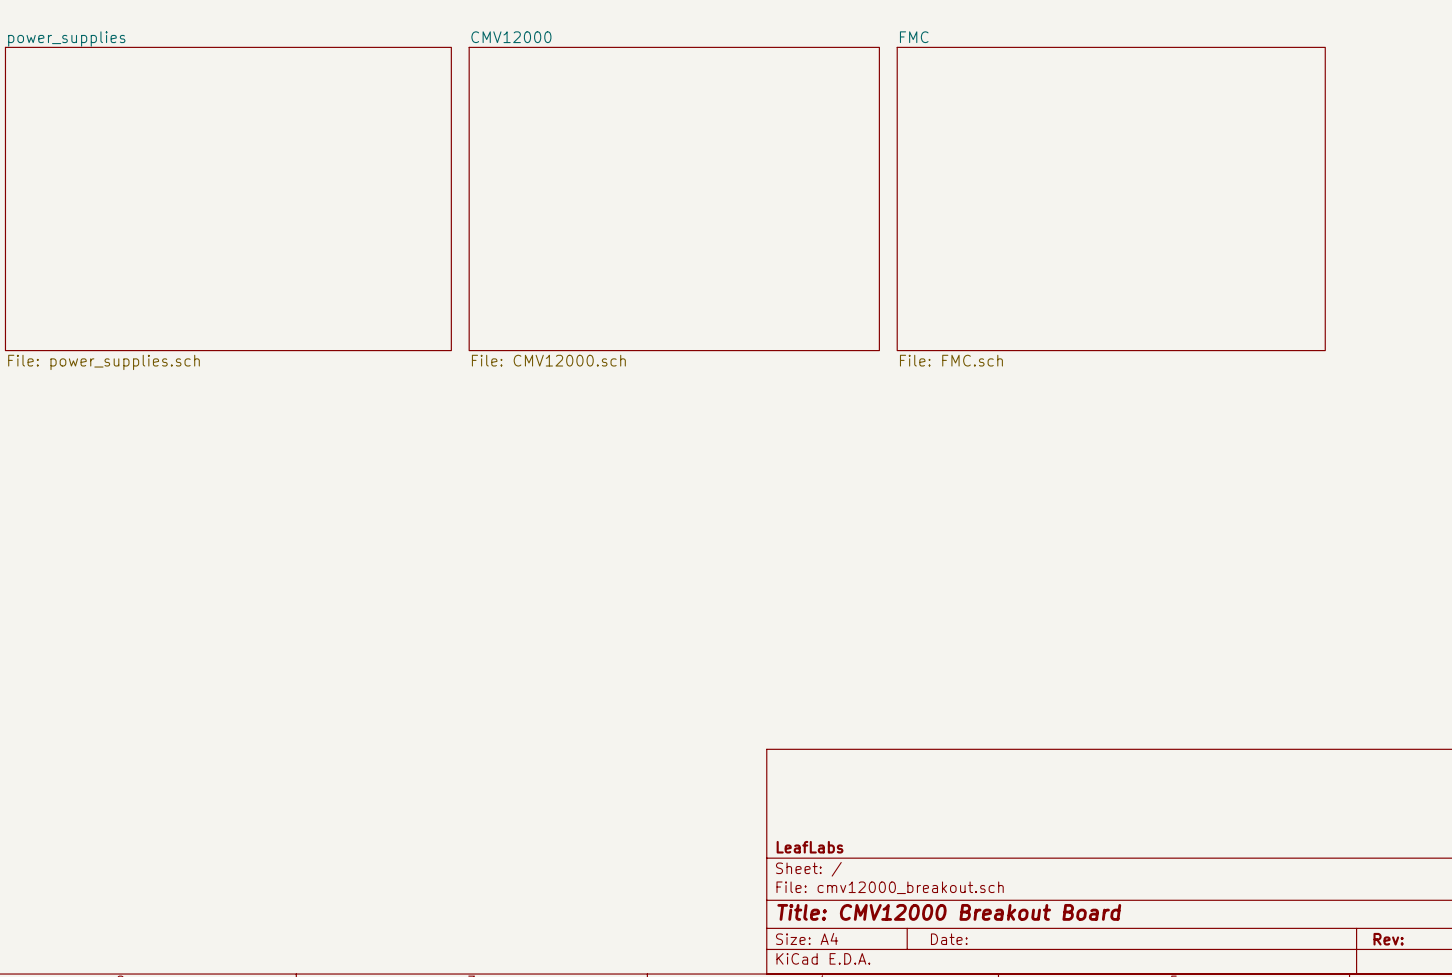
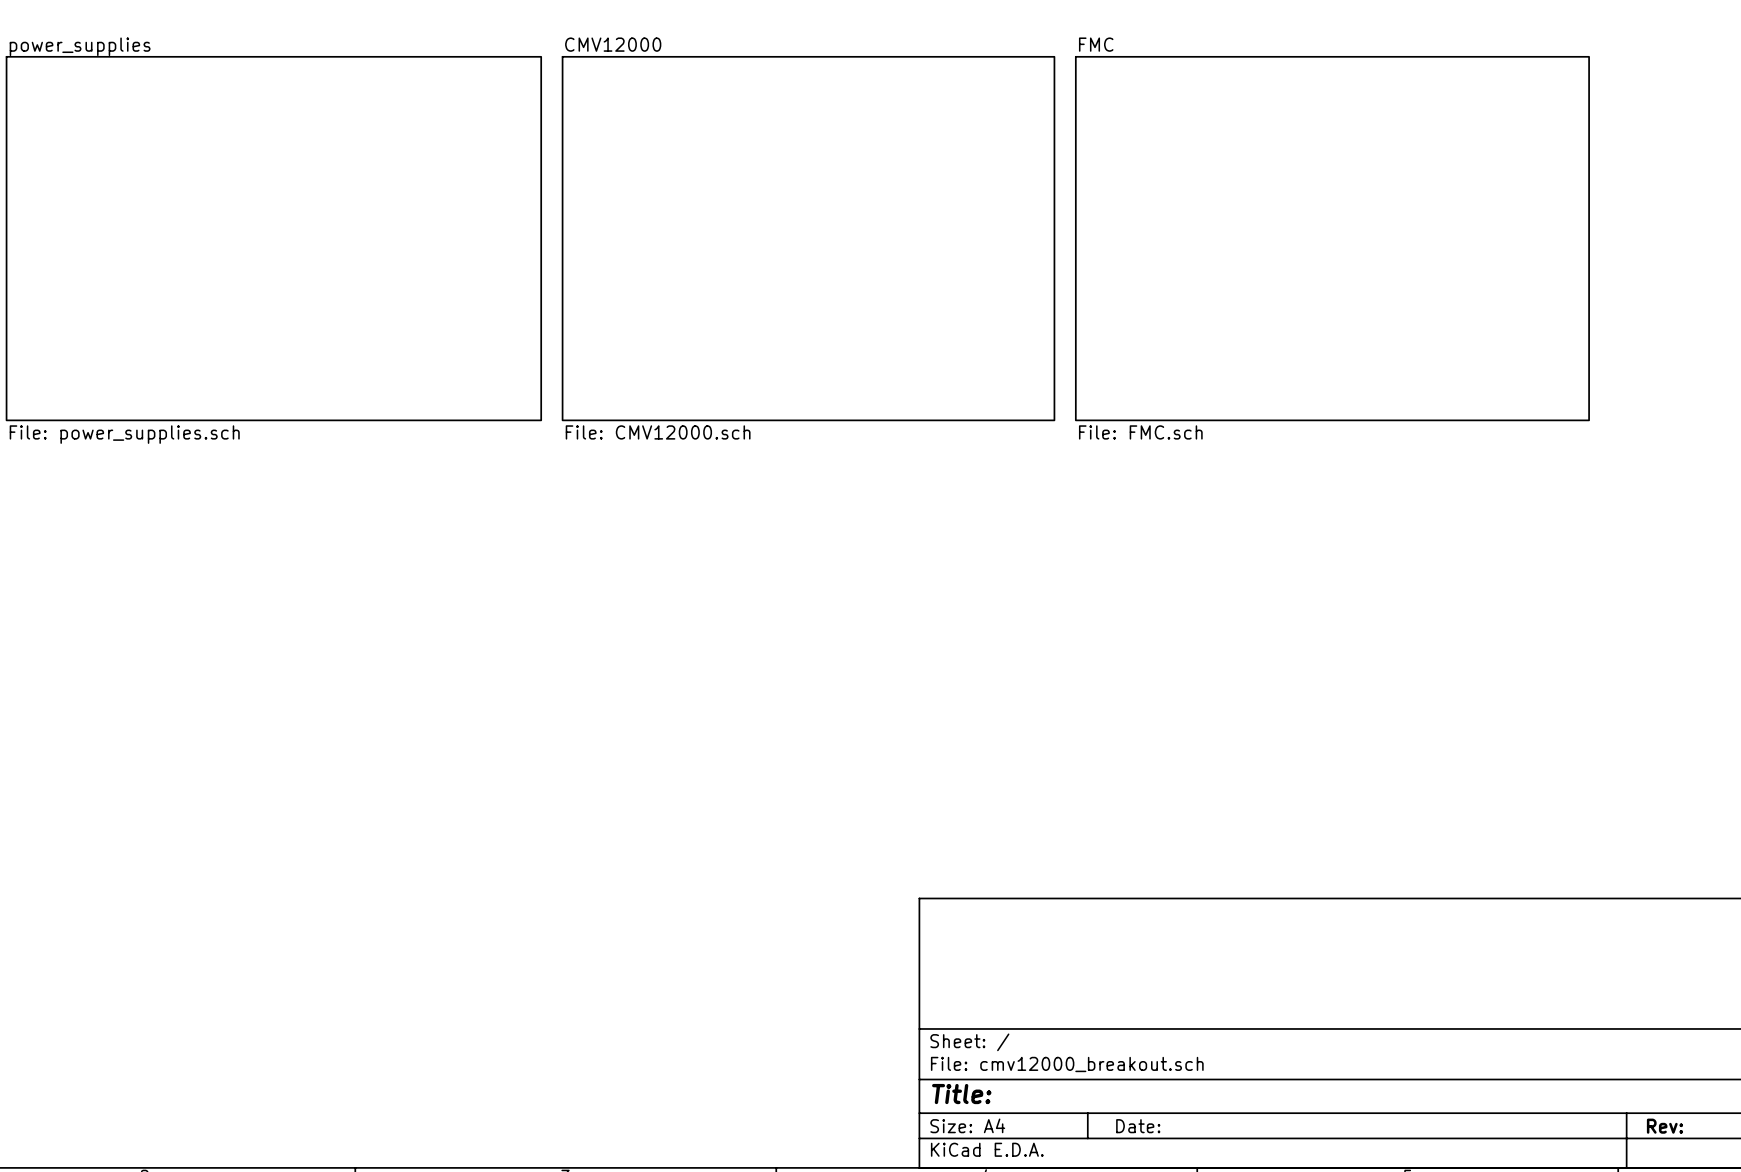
title block: LeafLabs (810, 847) -> none
title block: Title: CMV12000 Breakout Board (949, 912) -> Title: (961, 1094)

